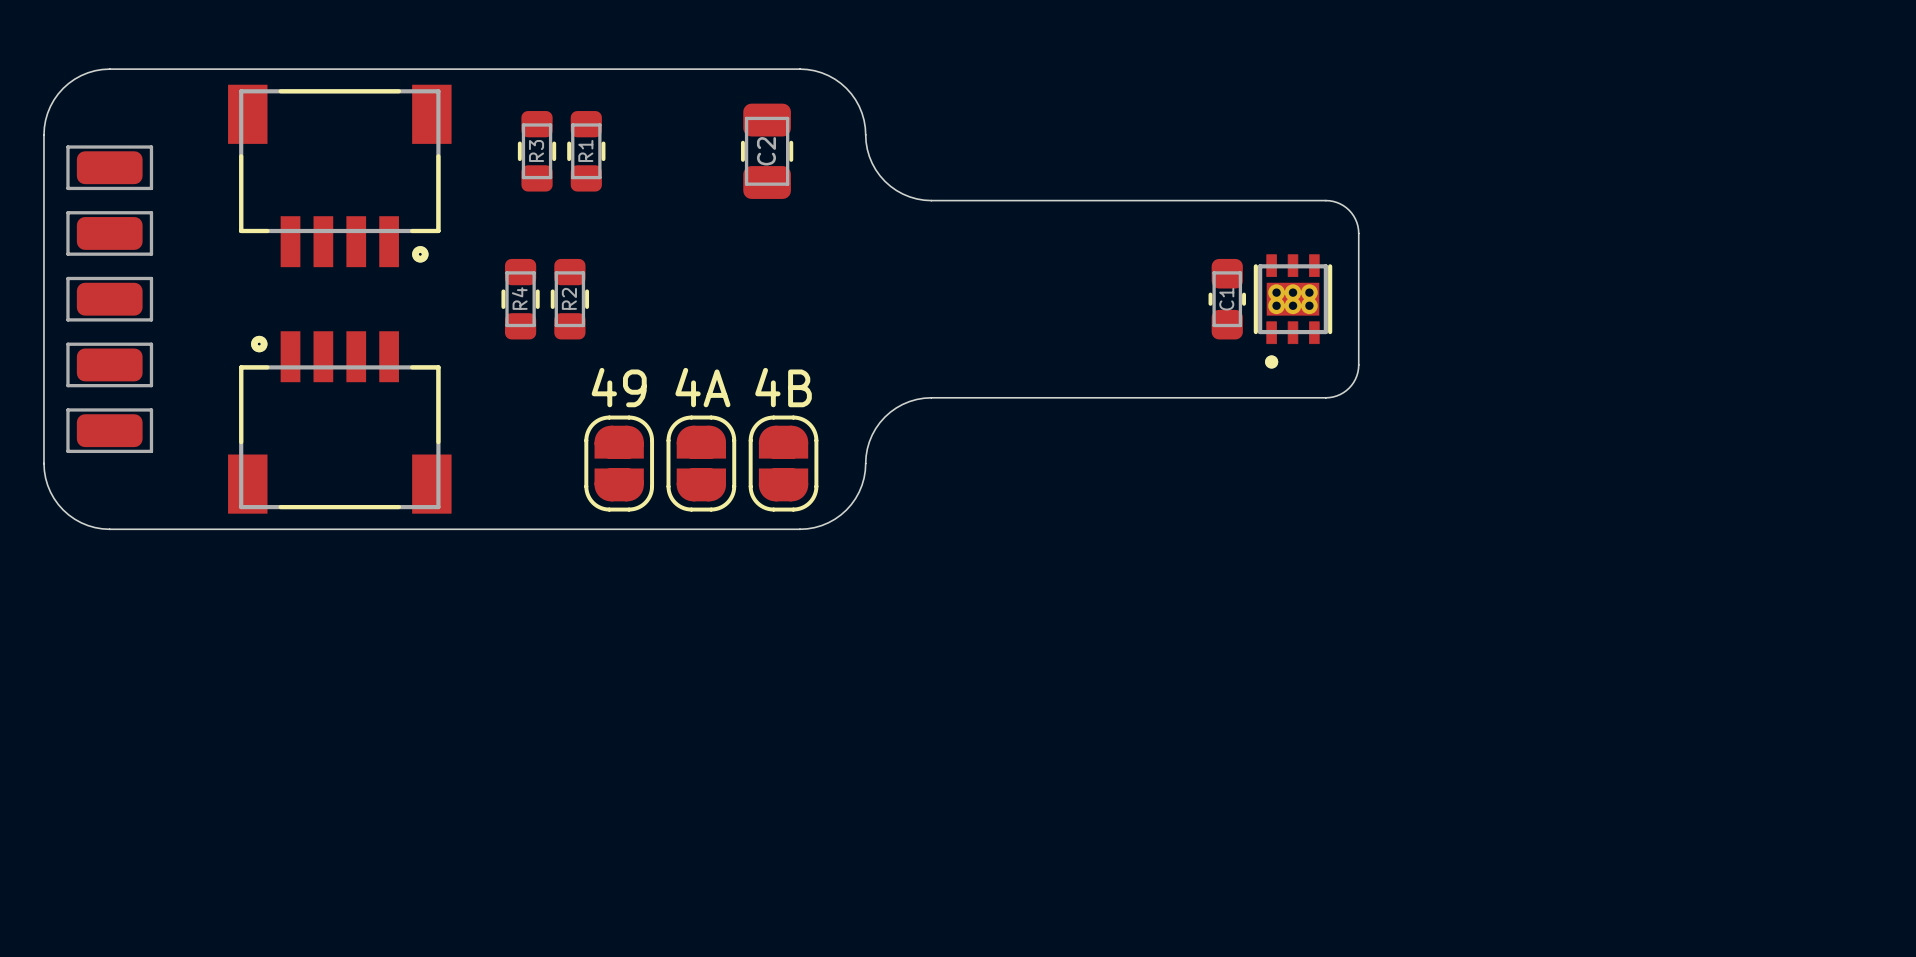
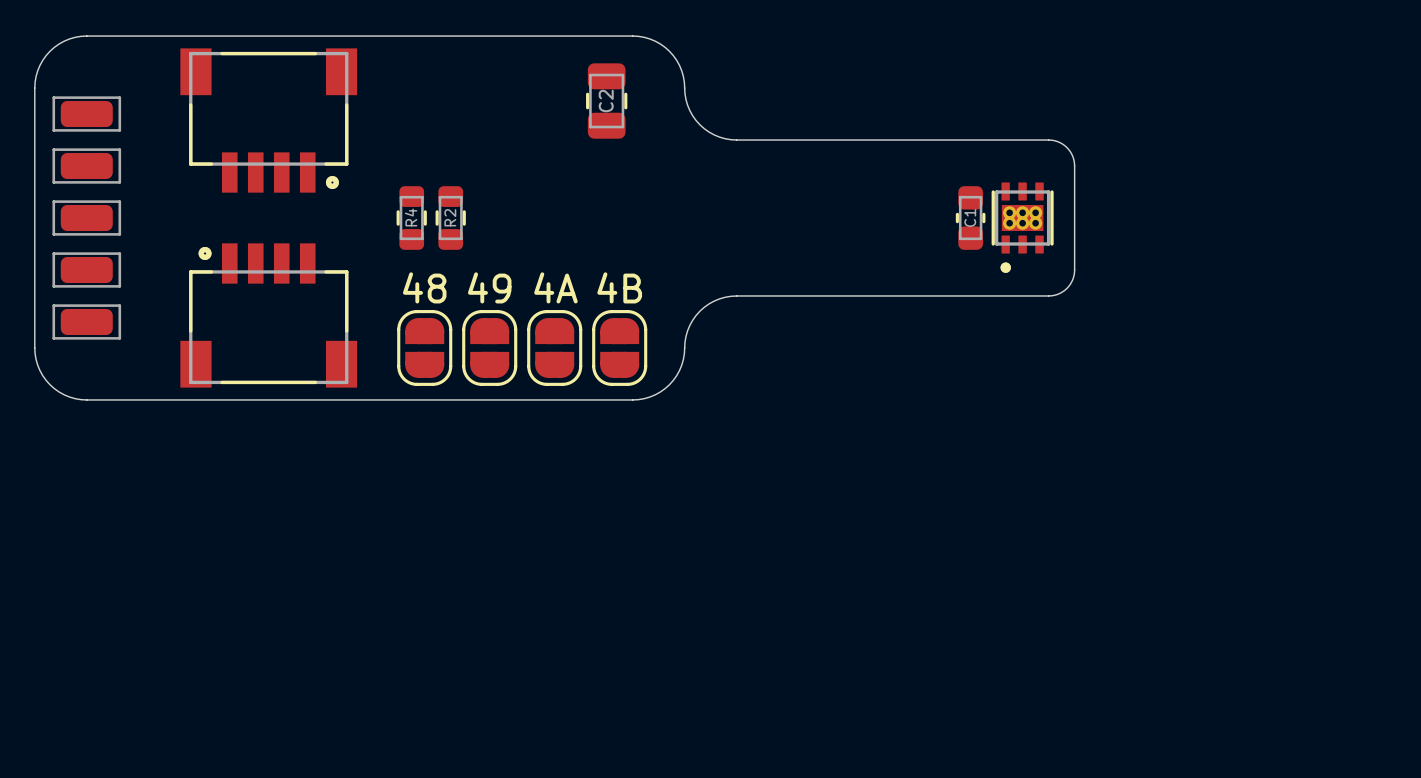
R3: (537, 151) -> none
R1: (586, 151) -> none
part: none -> 48 (424, 347)

